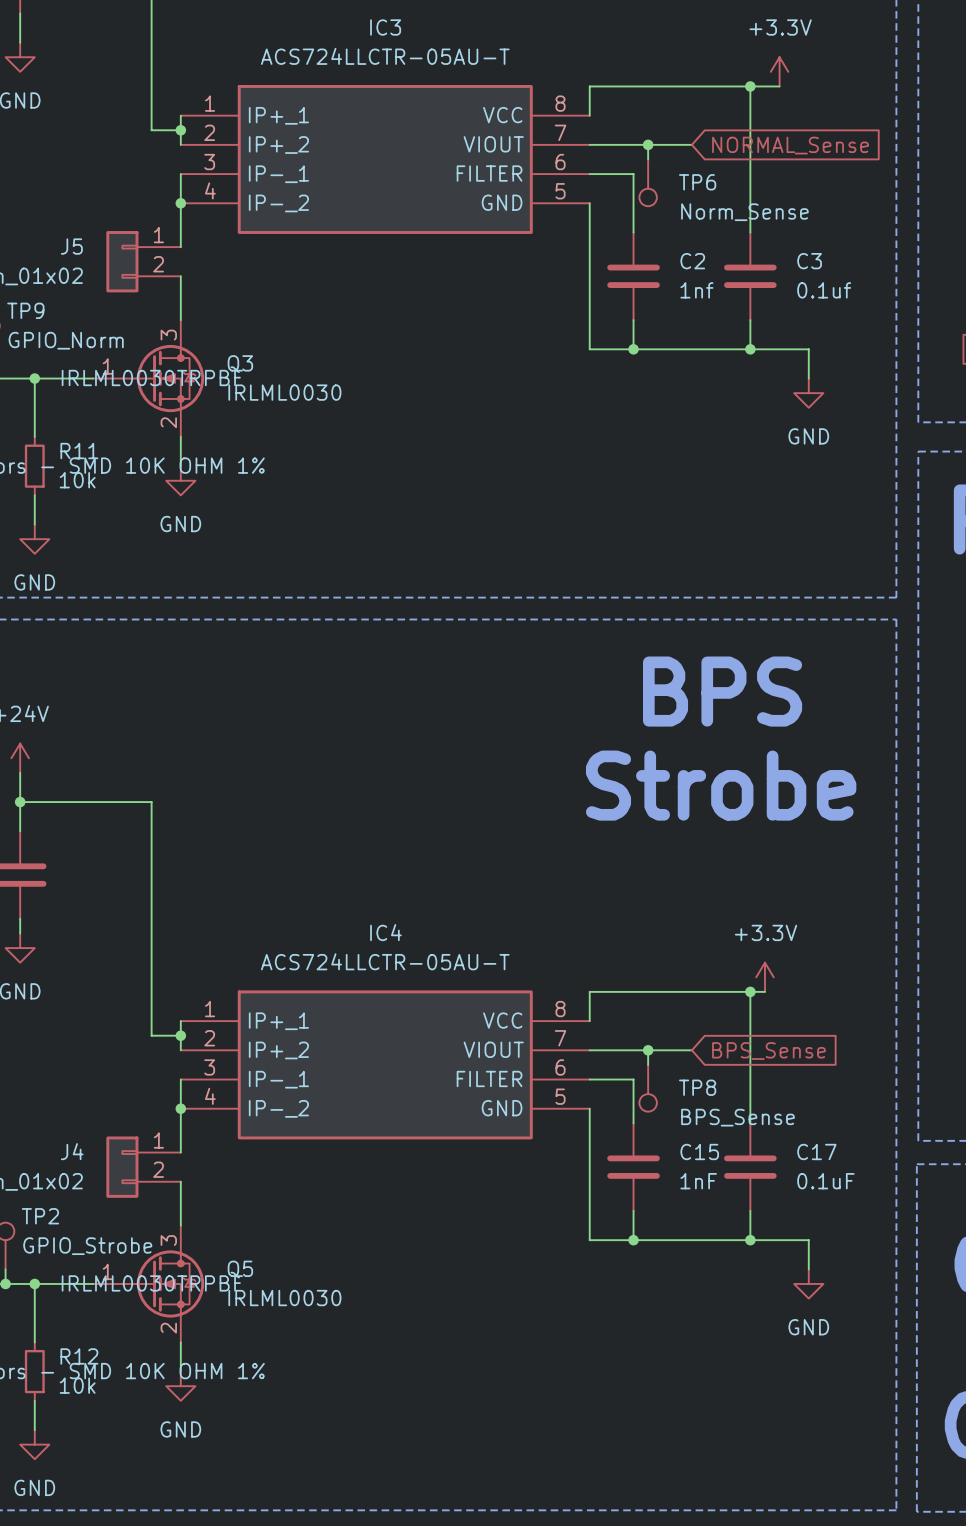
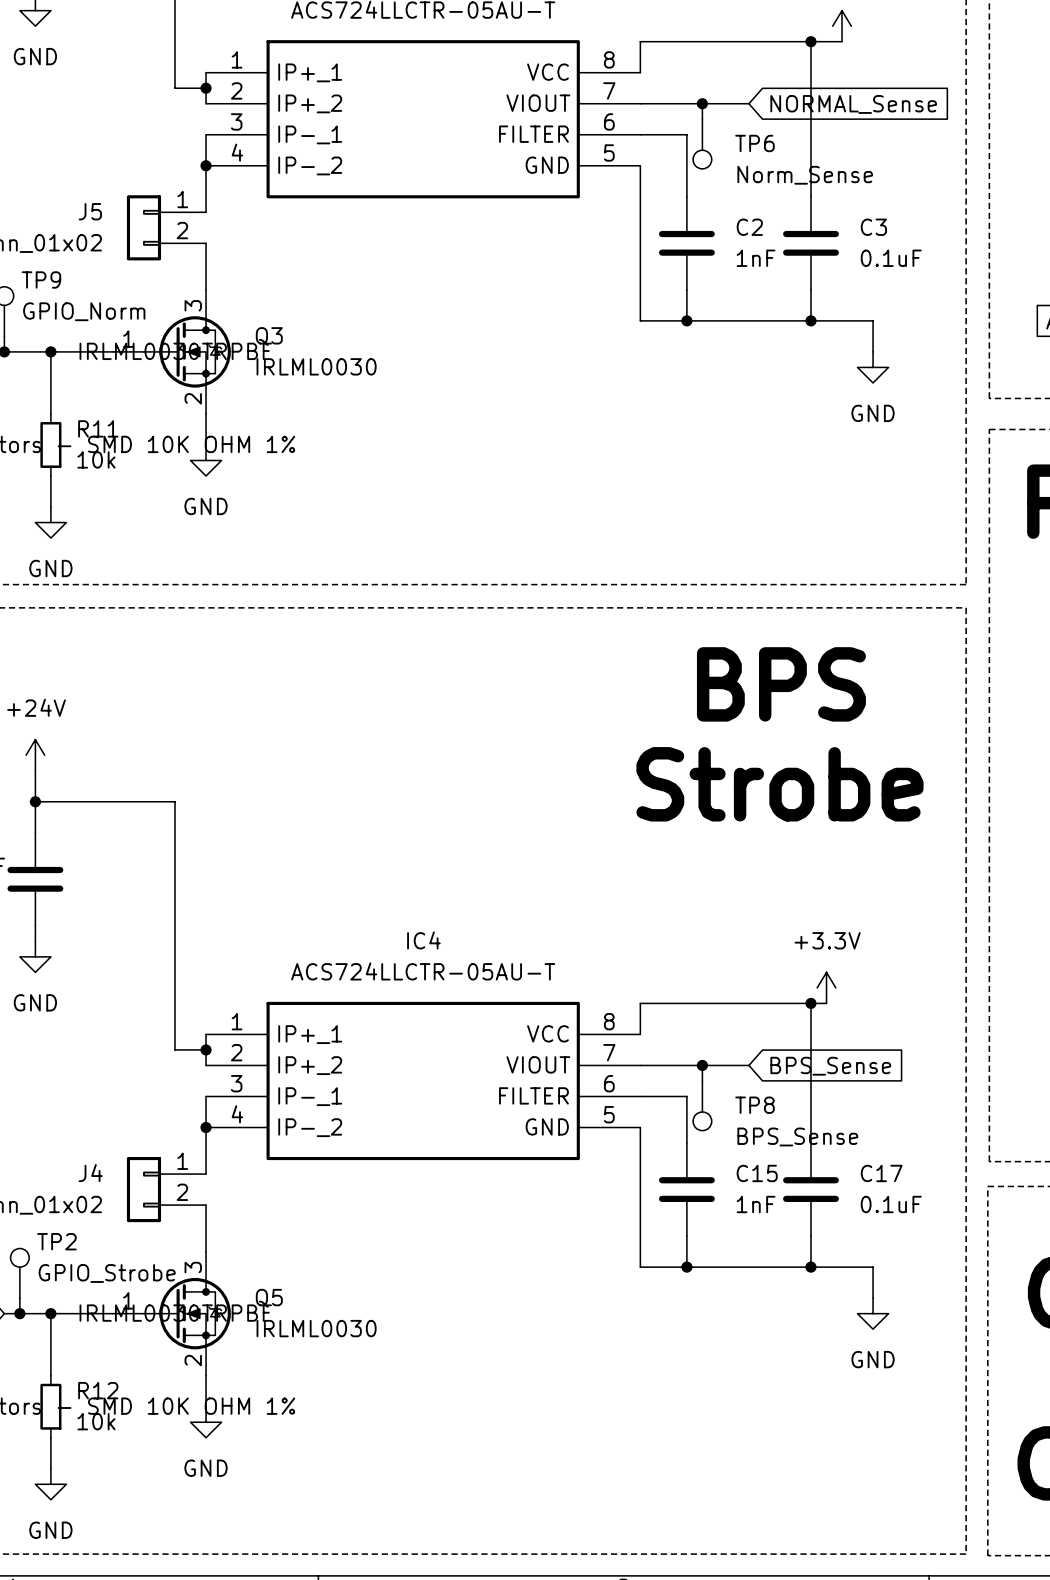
C2 value: 1nf (696, 290) -> 1nF (756, 258)
C3 value: 0.1uf (824, 290) -> 0.1uF (891, 258)

